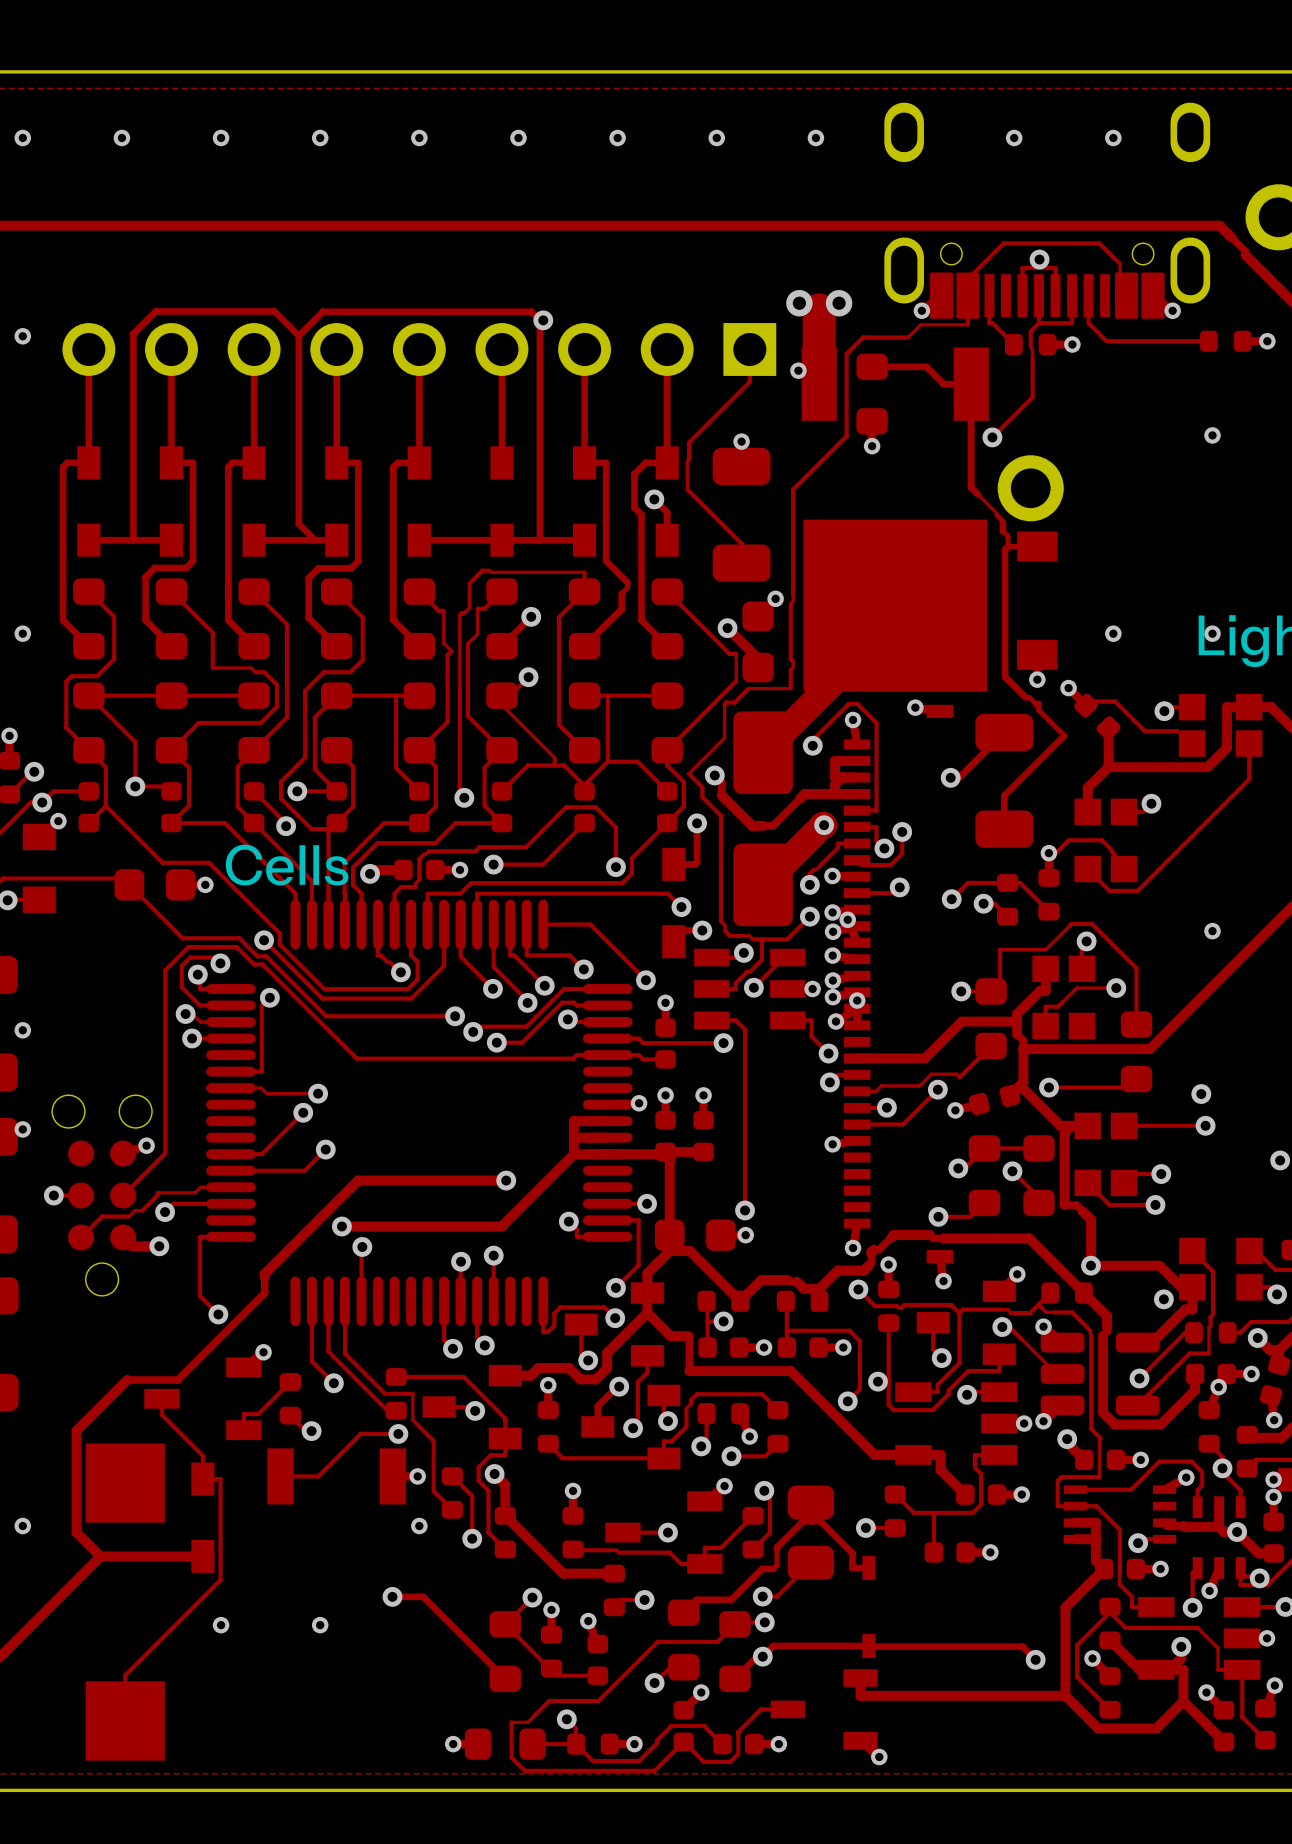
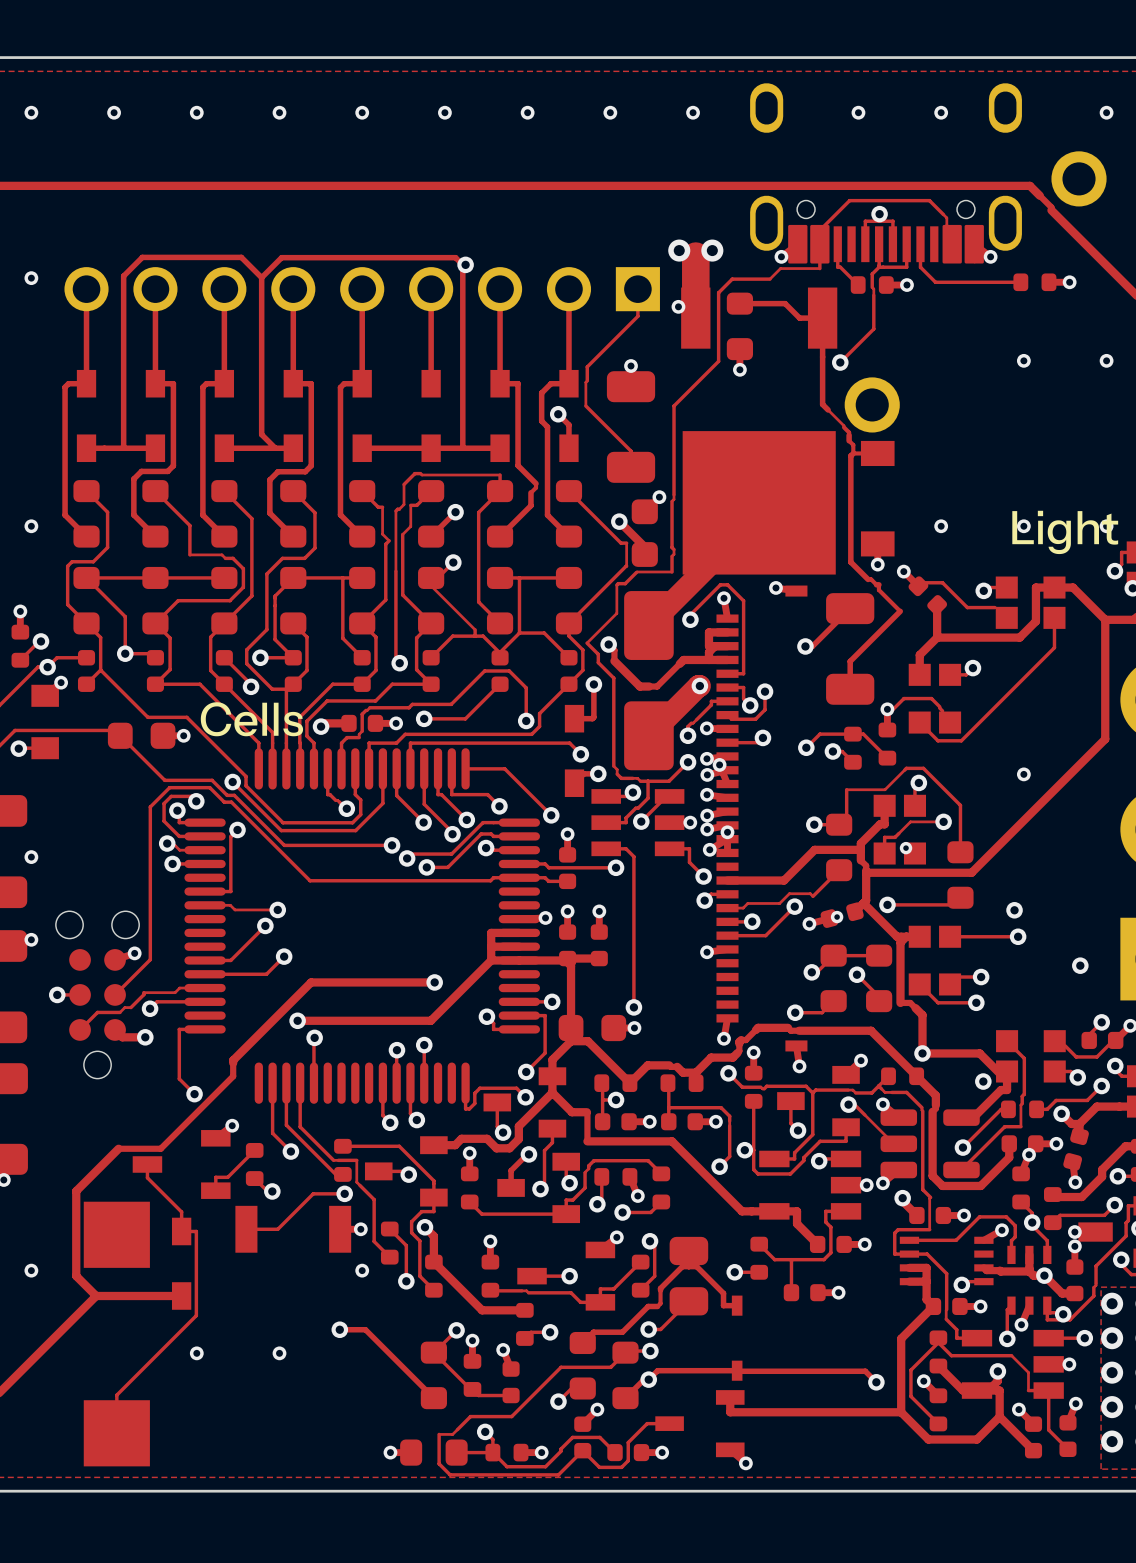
via: none -> (906, 848)
via: none -> (837, 917)

